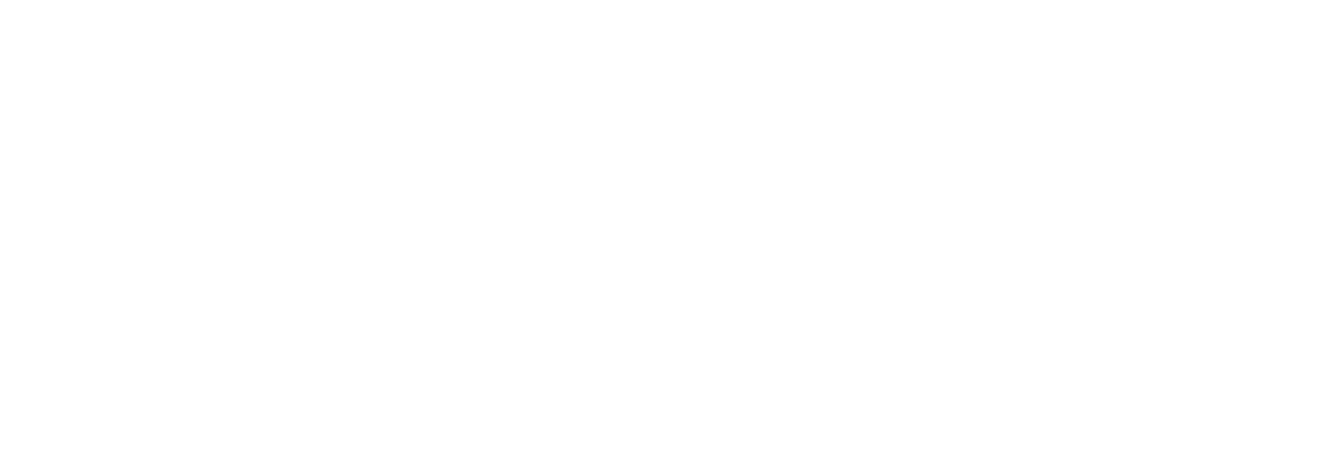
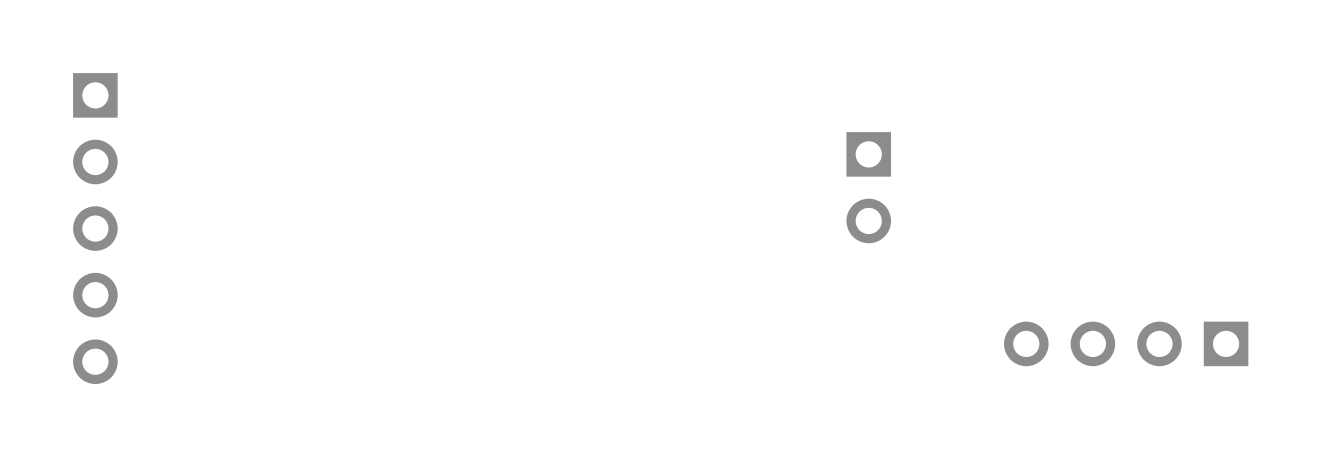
part: none -> (868, 187)
part: none -> (95, 228)
part: none -> (1126, 343)

